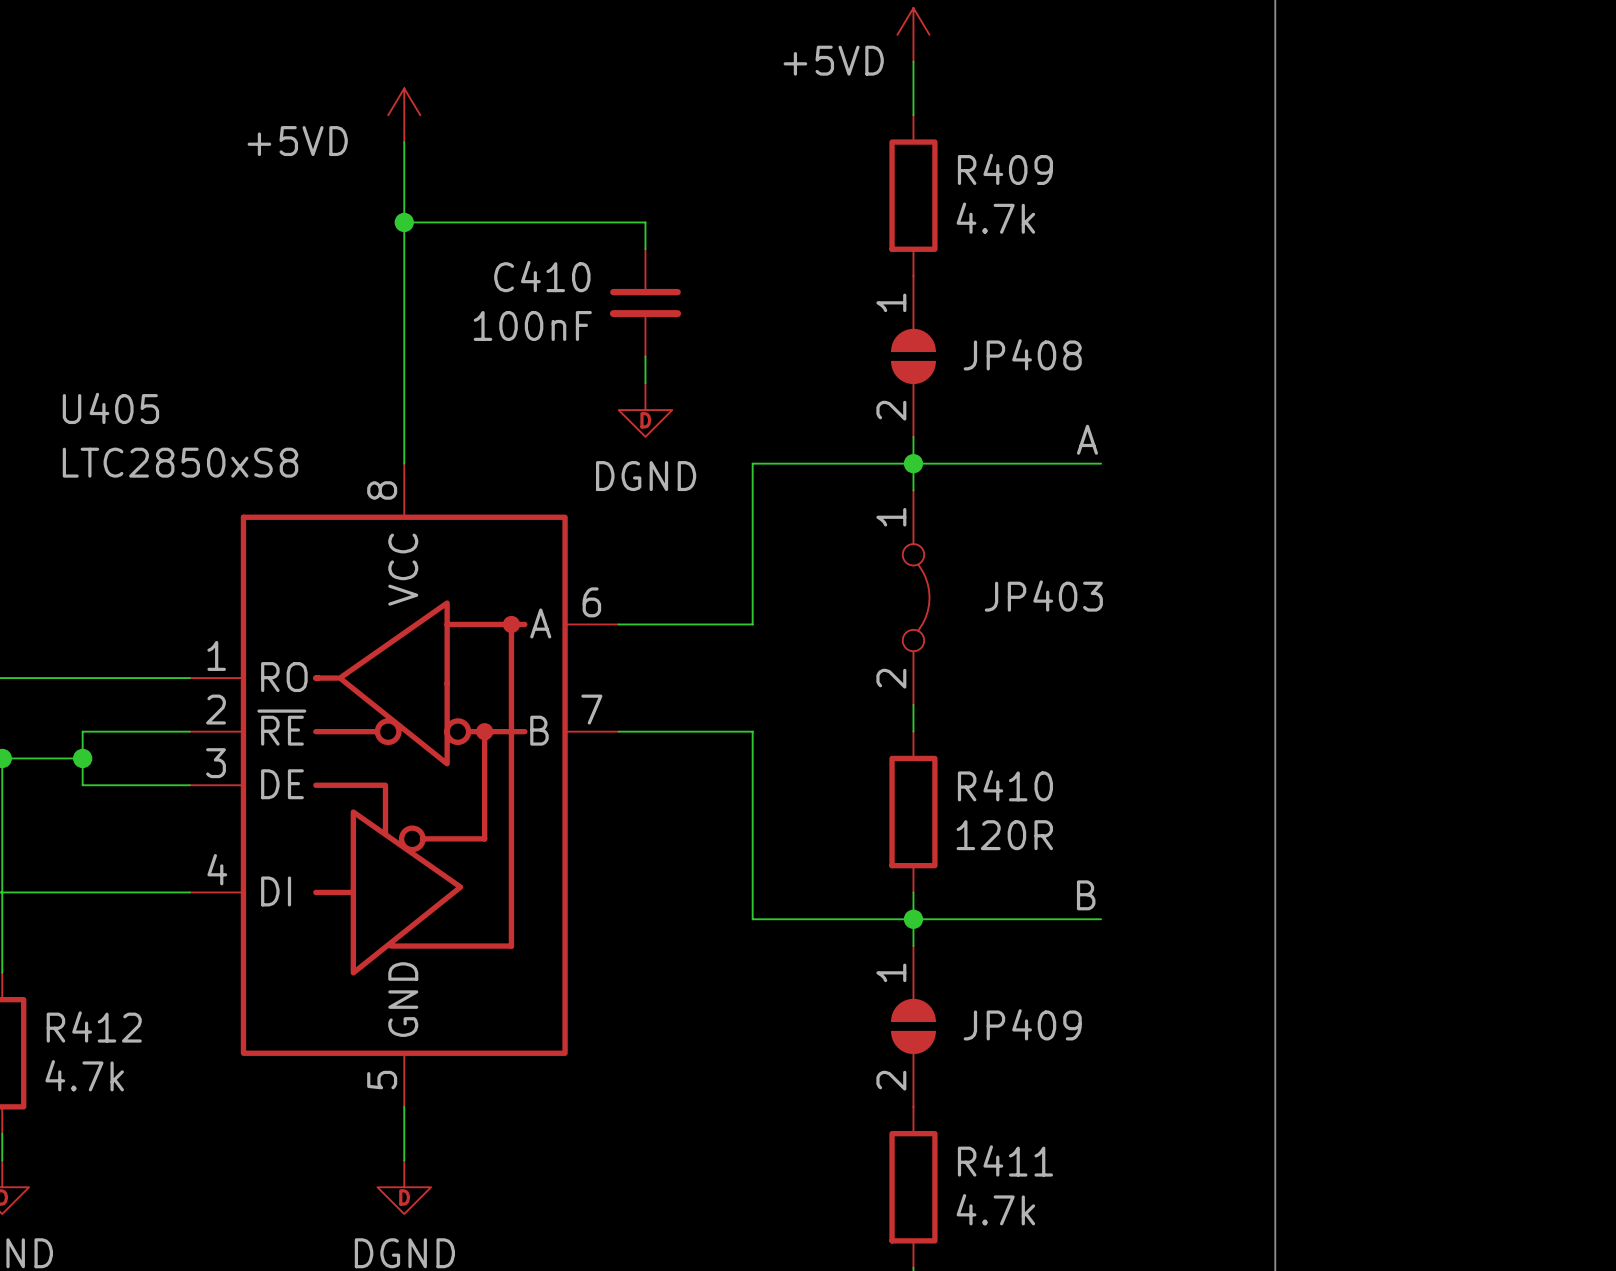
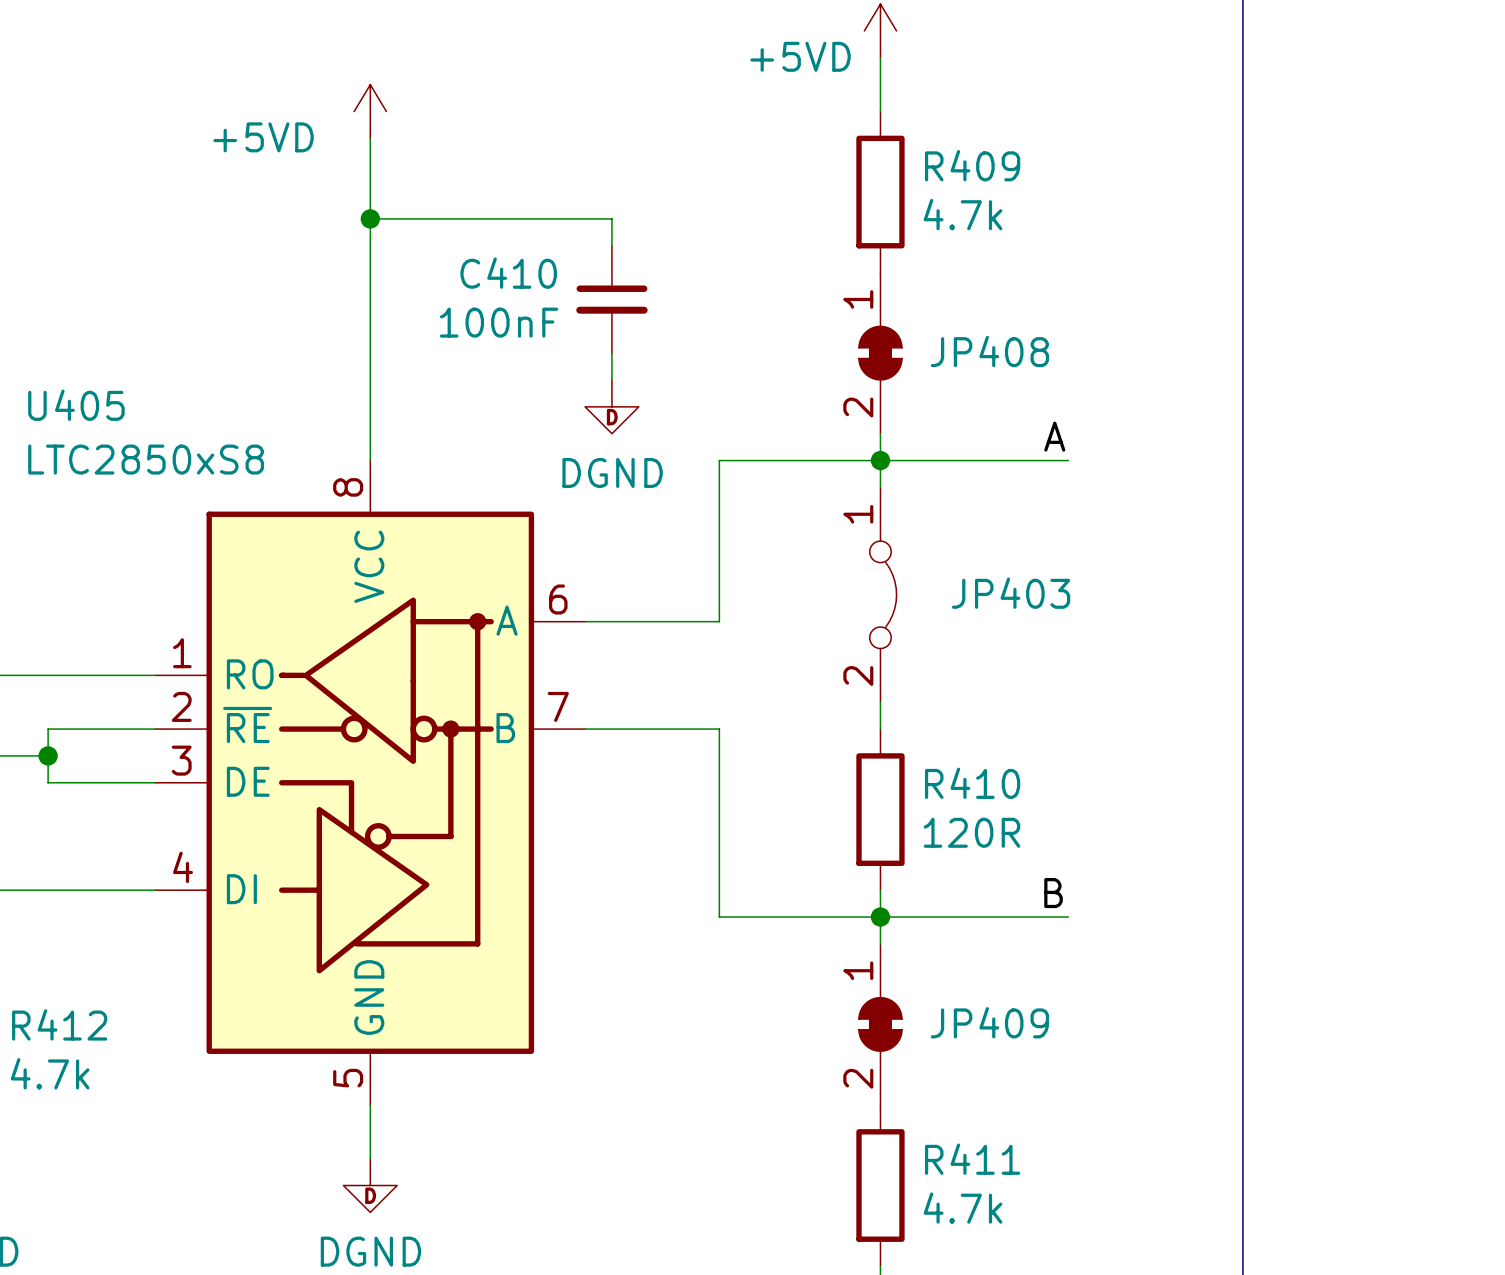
JP408 symbol: [892, 276, 935, 437] -> [858, 272, 902, 434]
JP409 symbol: [892, 946, 935, 1107] -> [858, 943, 902, 1105]

